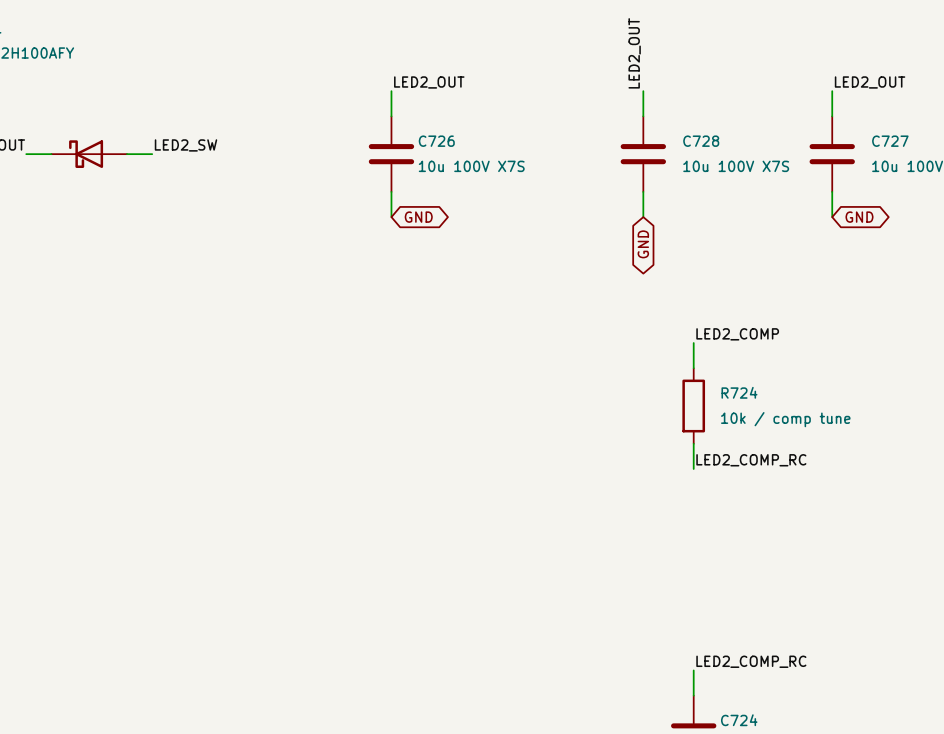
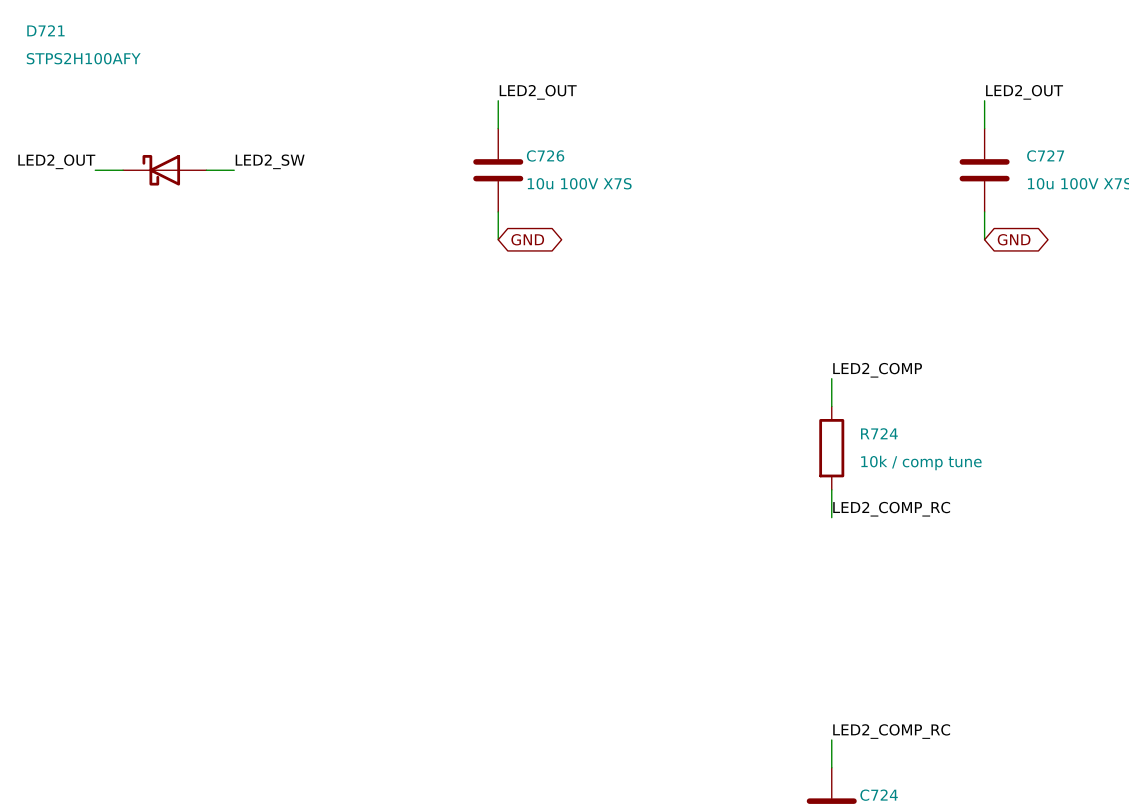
label: LED2_OUT (634, 53) -> none
wire: (643, 91) (643, 116) -> none
C728: 10u 100V X7S (643, 154) -> none
wire: (643, 191) (643, 217) -> none
global label: GND (643, 244) -> none

